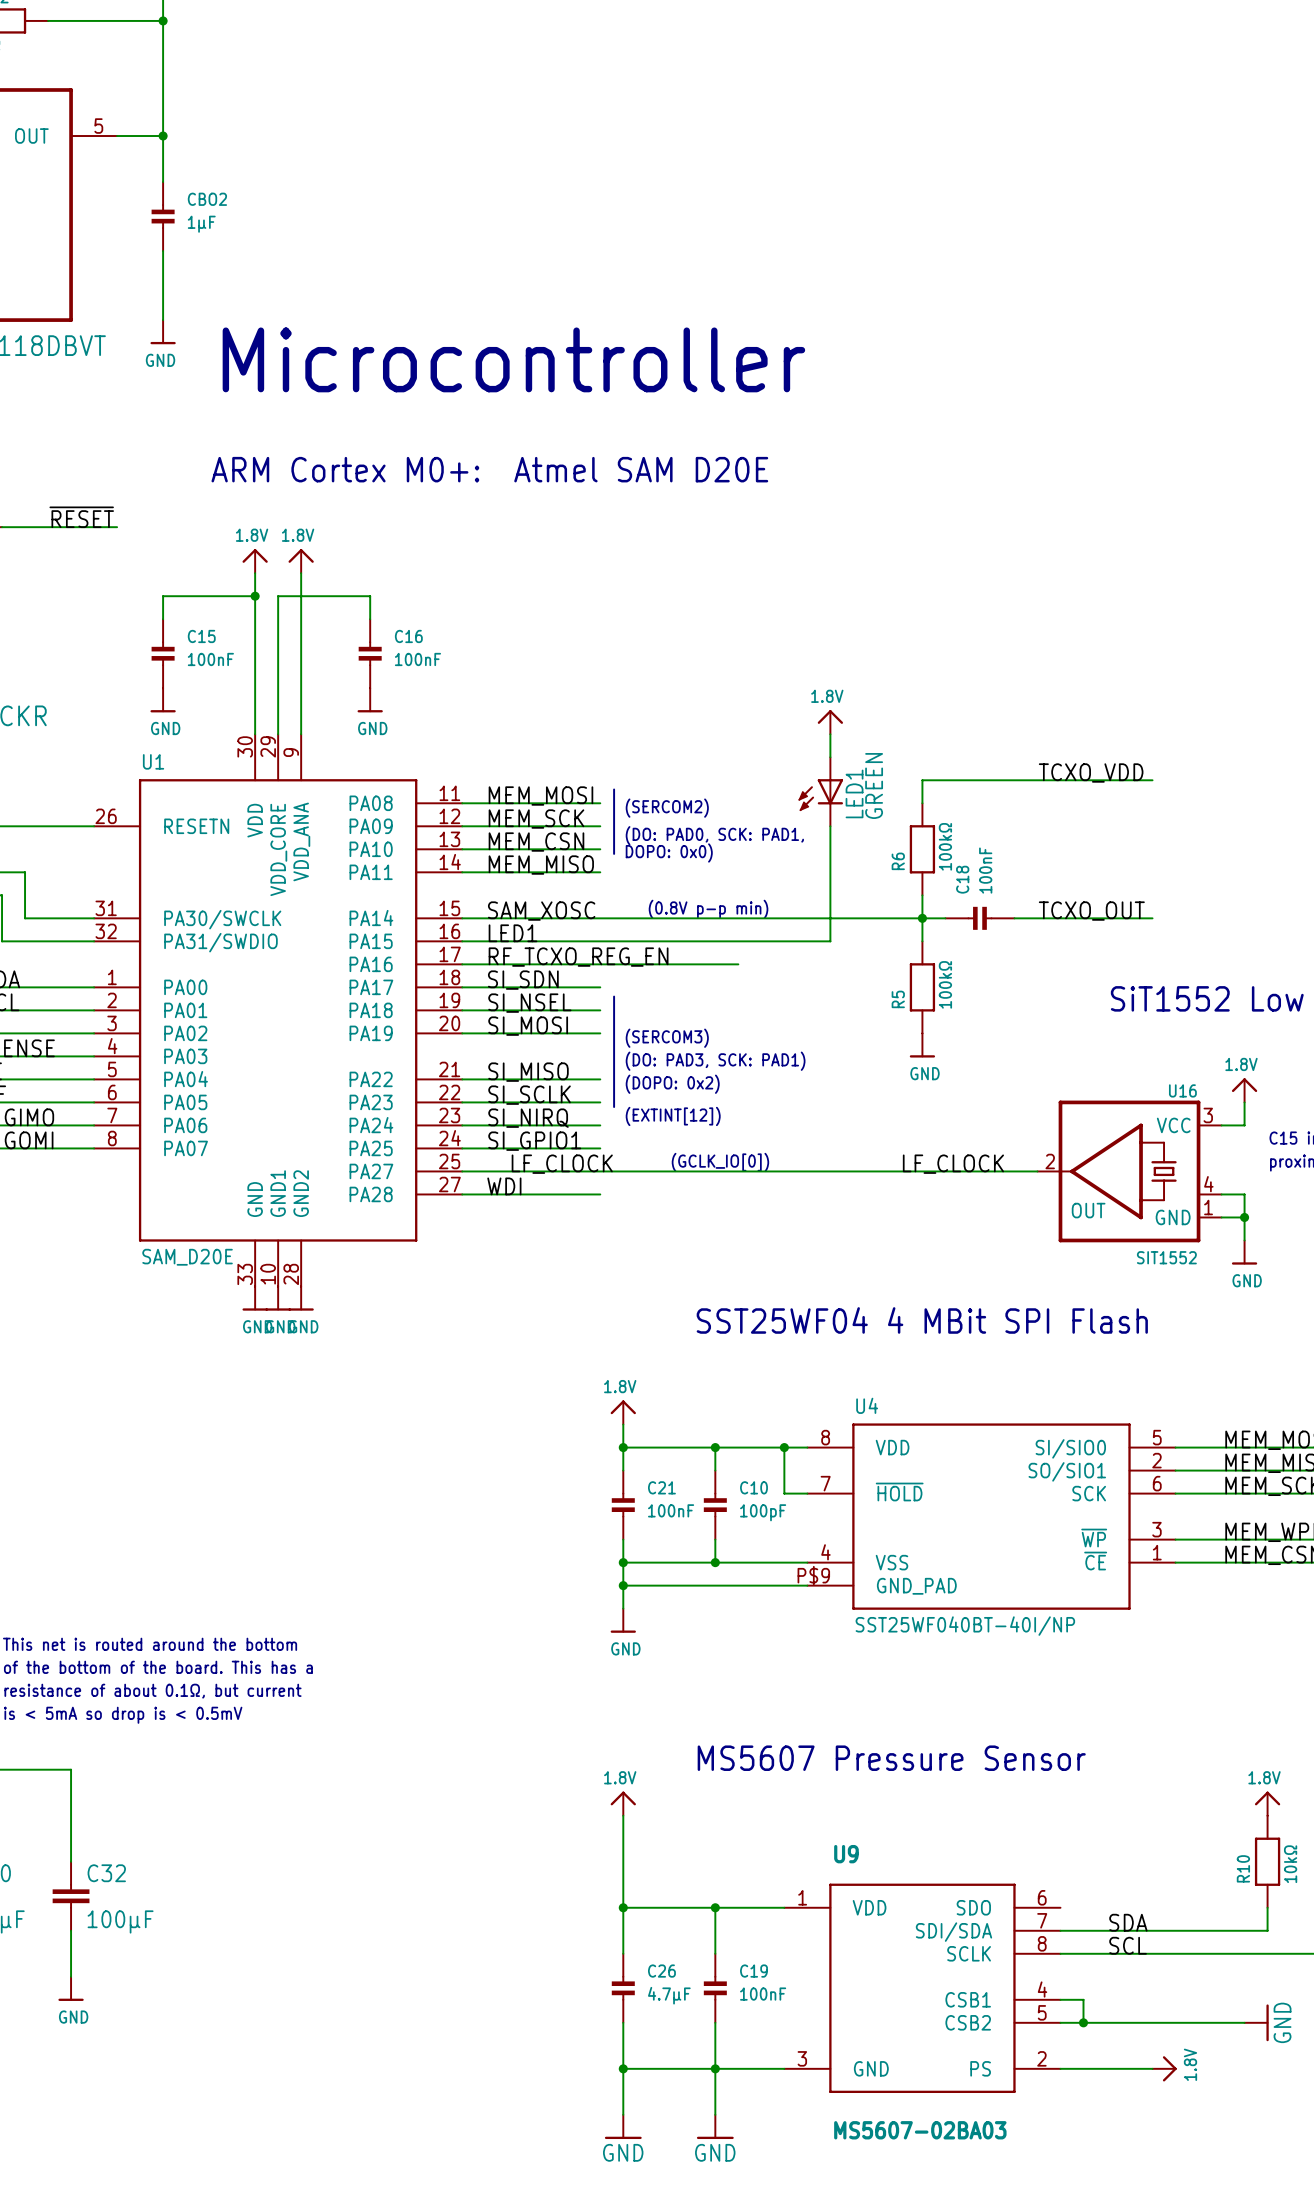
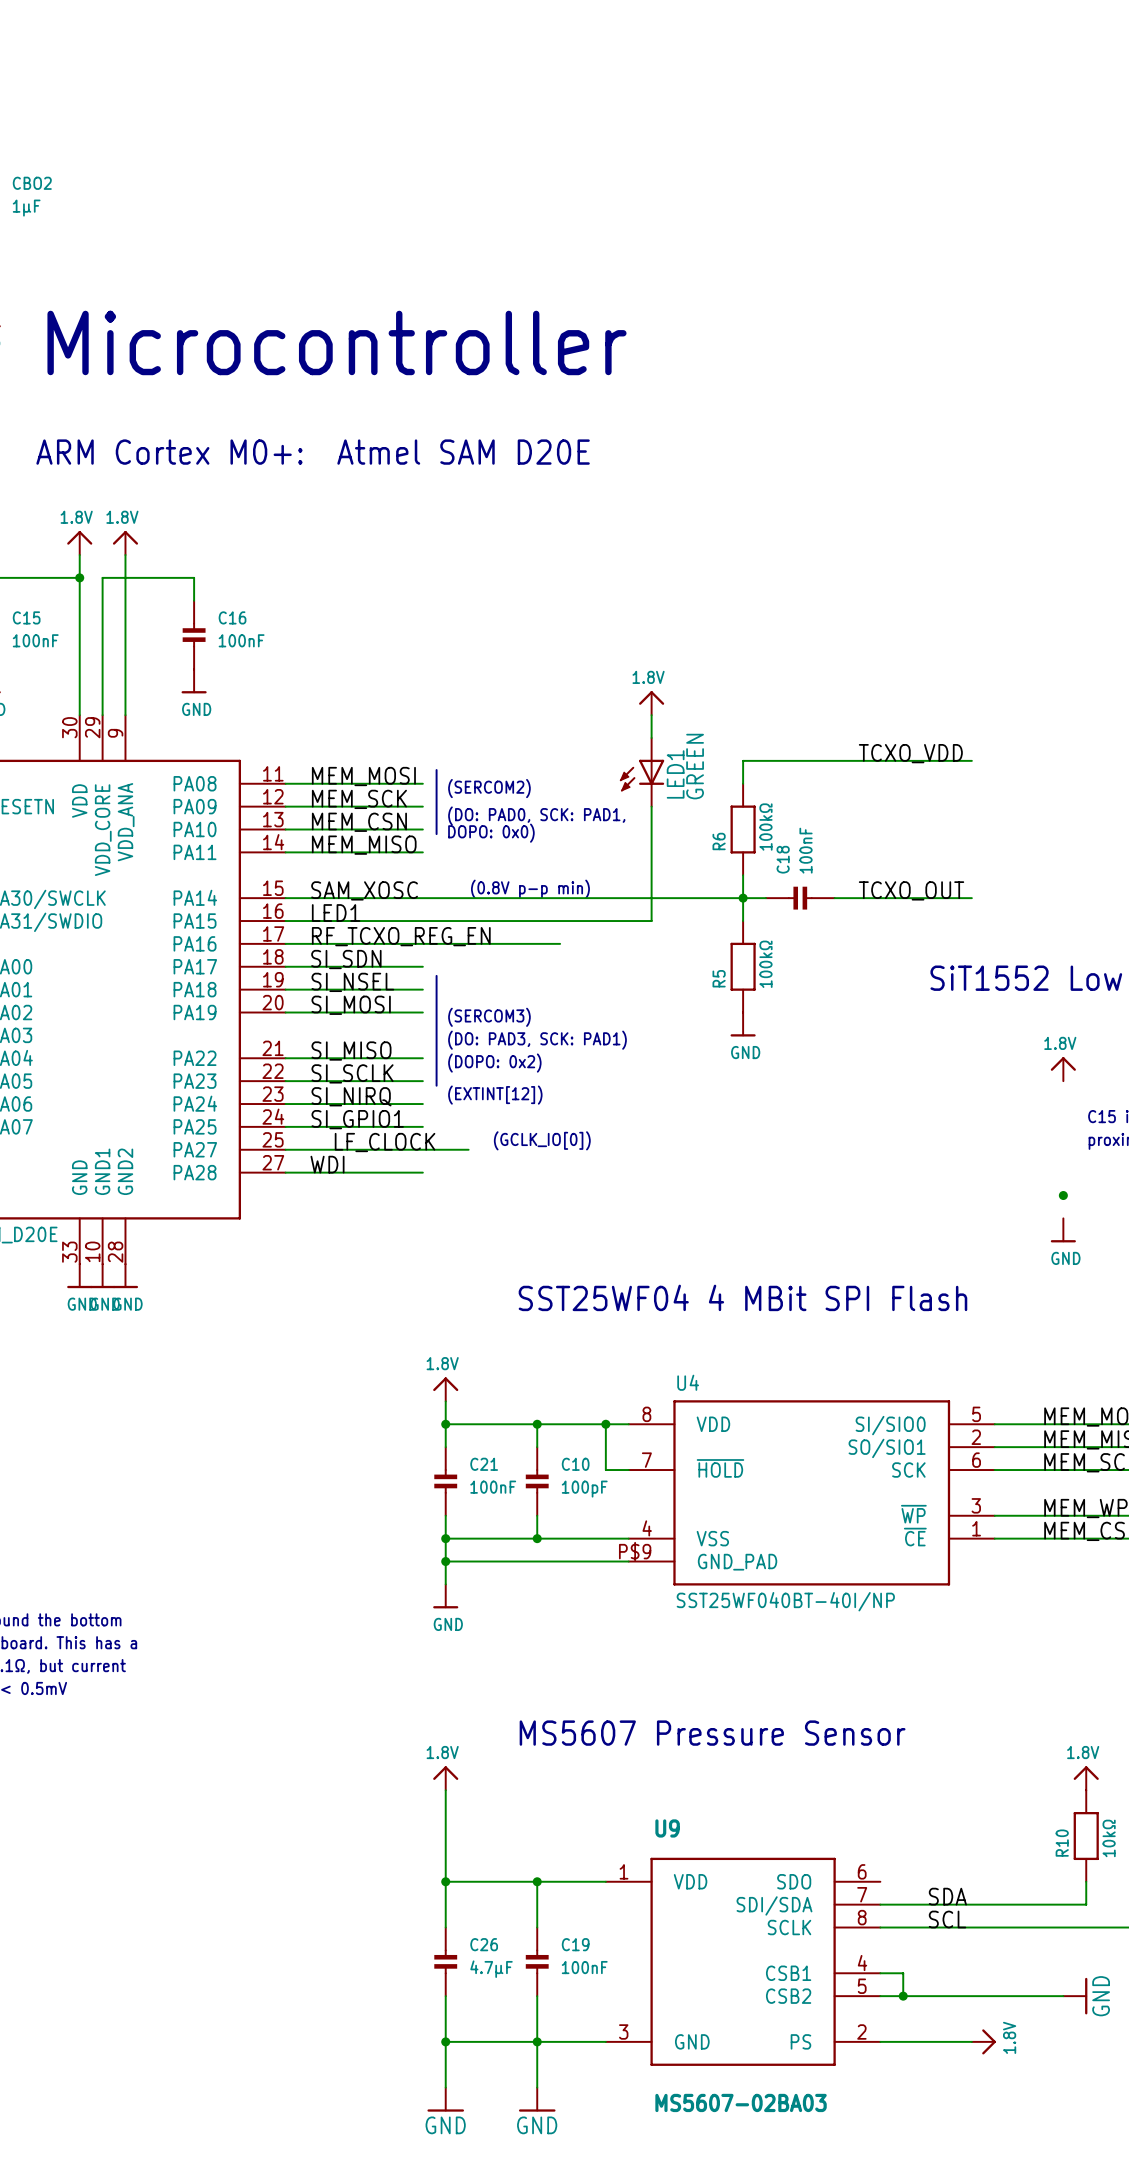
wire: (1244, 1102) (1244, 1125) (1221, 1125) -> none
label: LF_CLOCK (953, 1164) -> none
wire: (646, 1171) (1037, 1171) -> none
U16: SIT1552 (1129, 1171) -> none
wire: (1221, 1194) (1244, 1194) (1244, 1240) -> none
wire: (1221, 1217) (1244, 1217) -> none

